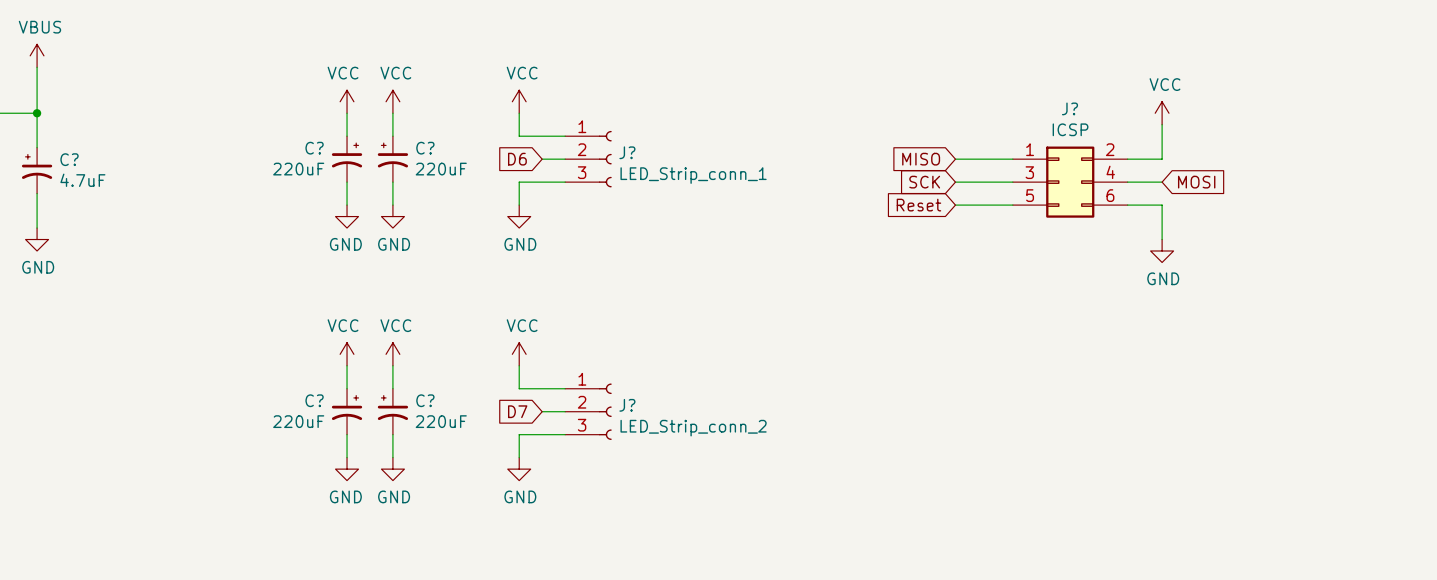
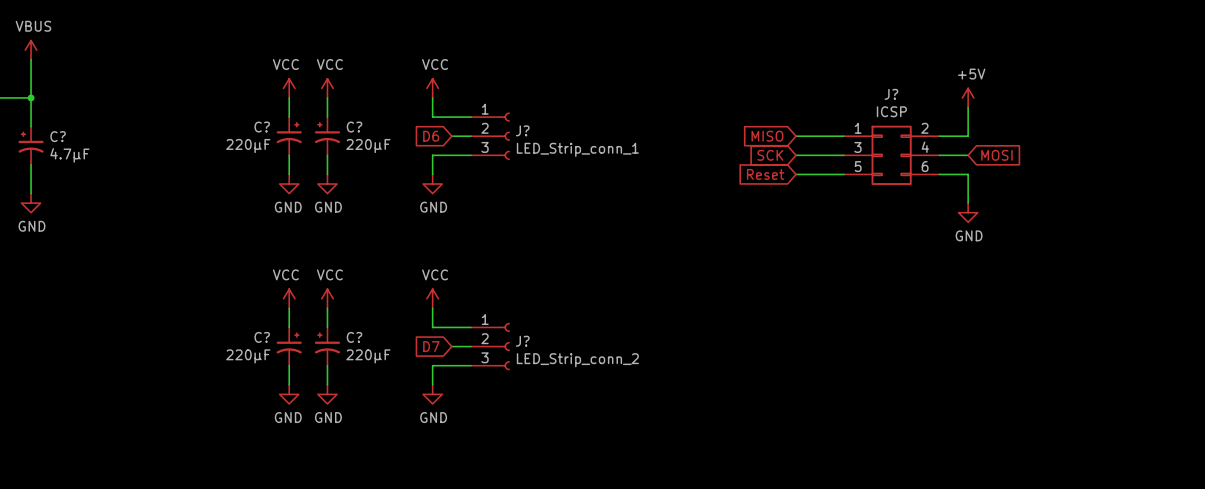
power symbol: VCC (1162, 113) -> +5V (968, 97)
C? value: 220uF (298, 169) -> 220μF (248, 146)
C? value: 220uF (441, 169) -> 220μF (368, 146)
C? value: 4.7uF (82, 180) -> 4.7μF (69, 155)
C? value: 220uF (298, 421) -> 220μF (248, 356)
C? value: 220uF (441, 421) -> 220μF (368, 356)

